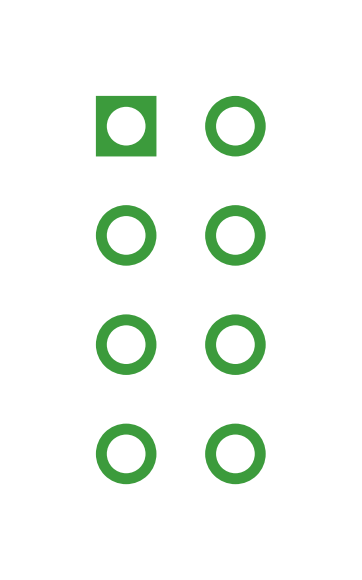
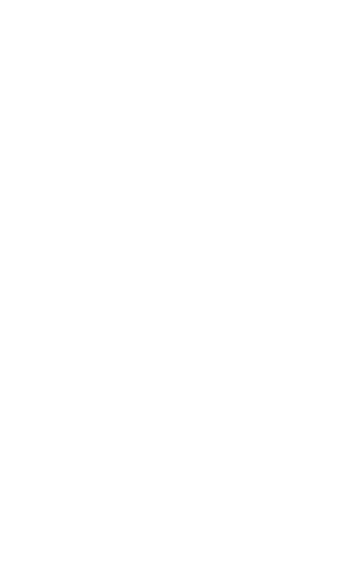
part: (180, 290) -> none

